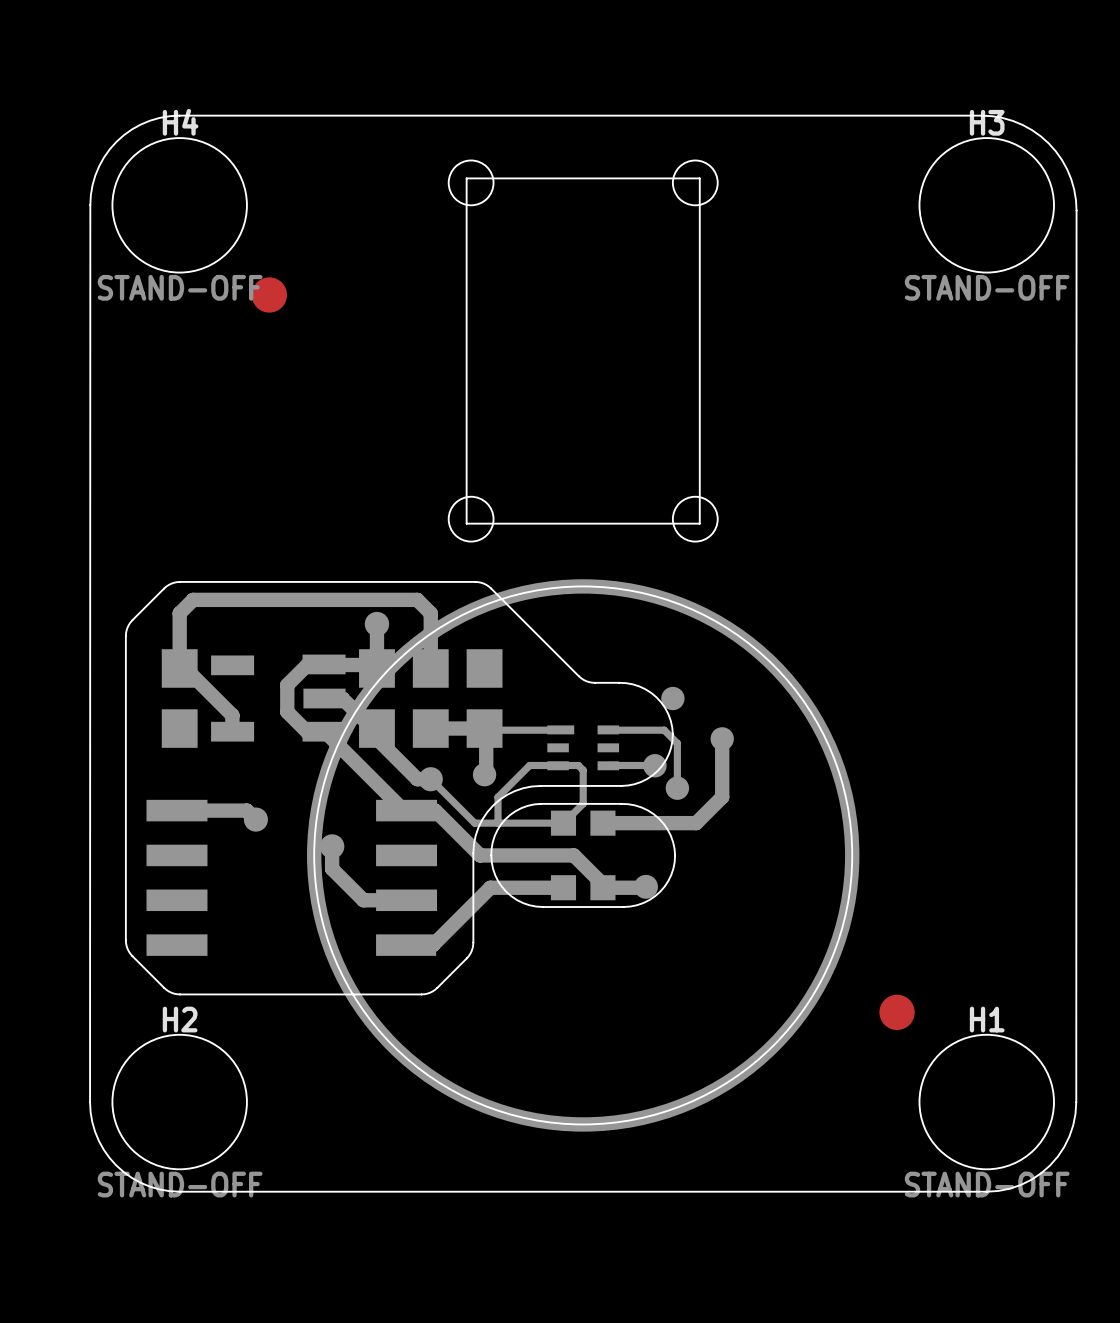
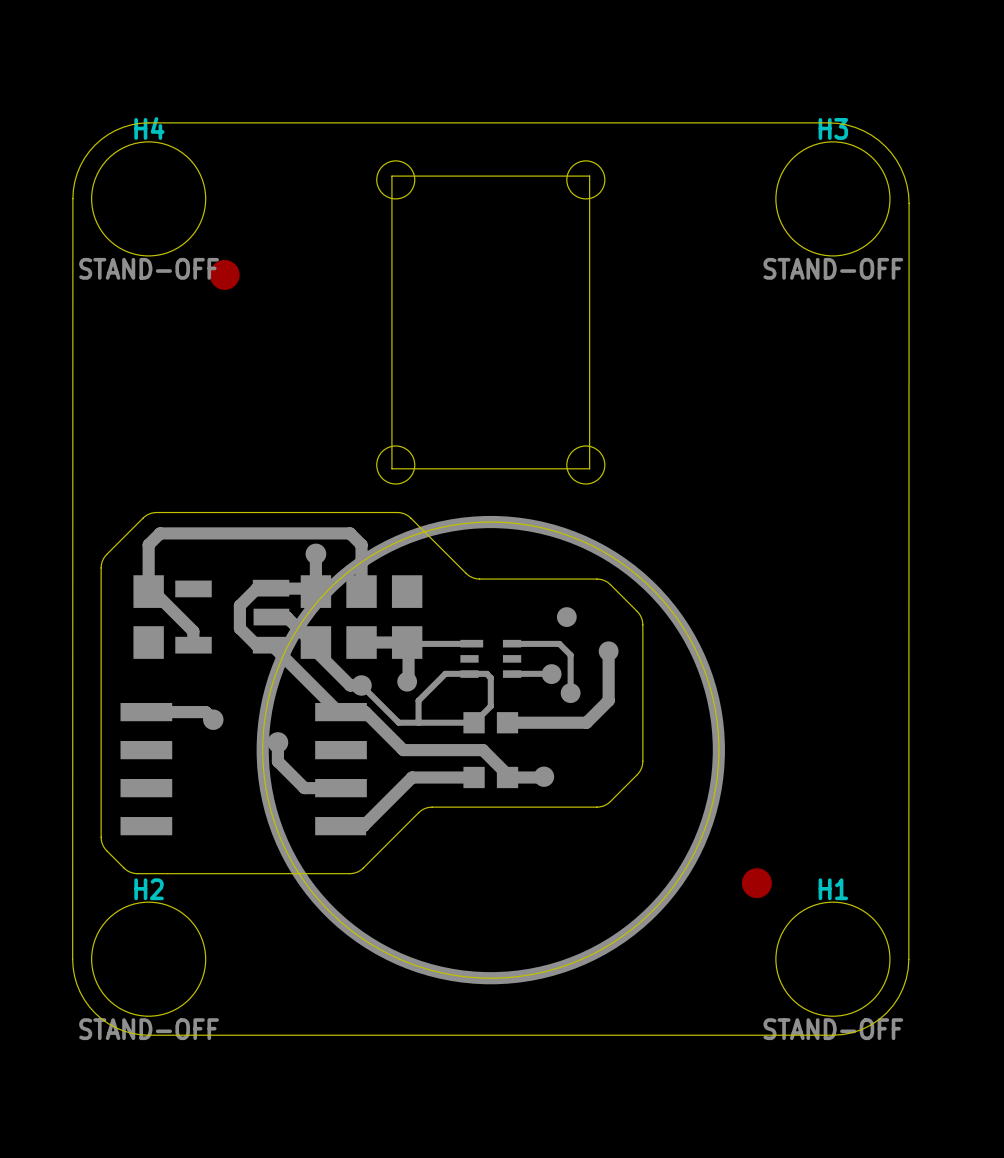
board edge: (180, 581) (475, 581) (483, 583) (491, 588) (583, 679) (591, 682) (632, 684) (645, 689) (656, 697) (668, 714) (672, 727) (672, 741) (668, 754) (662, 765) (652, 775) (634, 784) (531, 786) (506, 794) (493, 805) (482, 819) (473, 844) (472, 948) (466, 958) (430, 992) (421, 994) (180, 994) (171, 992) (132, 956) (126, 943) (125, 636) (130, 622) (164, 588) (171, 583) (180, 581) -> (156, 512) (143, 518) (106, 554) (101, 565) (101, 839) (105, 848) (128, 871) (137, 873) (352, 873) (363, 868) (424, 808) (599, 806) (610, 801) (640, 770) (642, 761) (642, 622) (637, 611) (606, 581) (596, 579) (474, 578) (466, 573) (410, 518) (399, 512) (156, 512)
board edge: (540, 803) (628, 804) (647, 810) (663, 823) (673, 841) (674, 862) (668, 881) (654, 896) (643, 903) (630, 906) (542, 907) (529, 905) (517, 900) (501, 886) (495, 875) (491, 862) (492, 842) (497, 830) (510, 814) (527, 805) (540, 803) -> none

